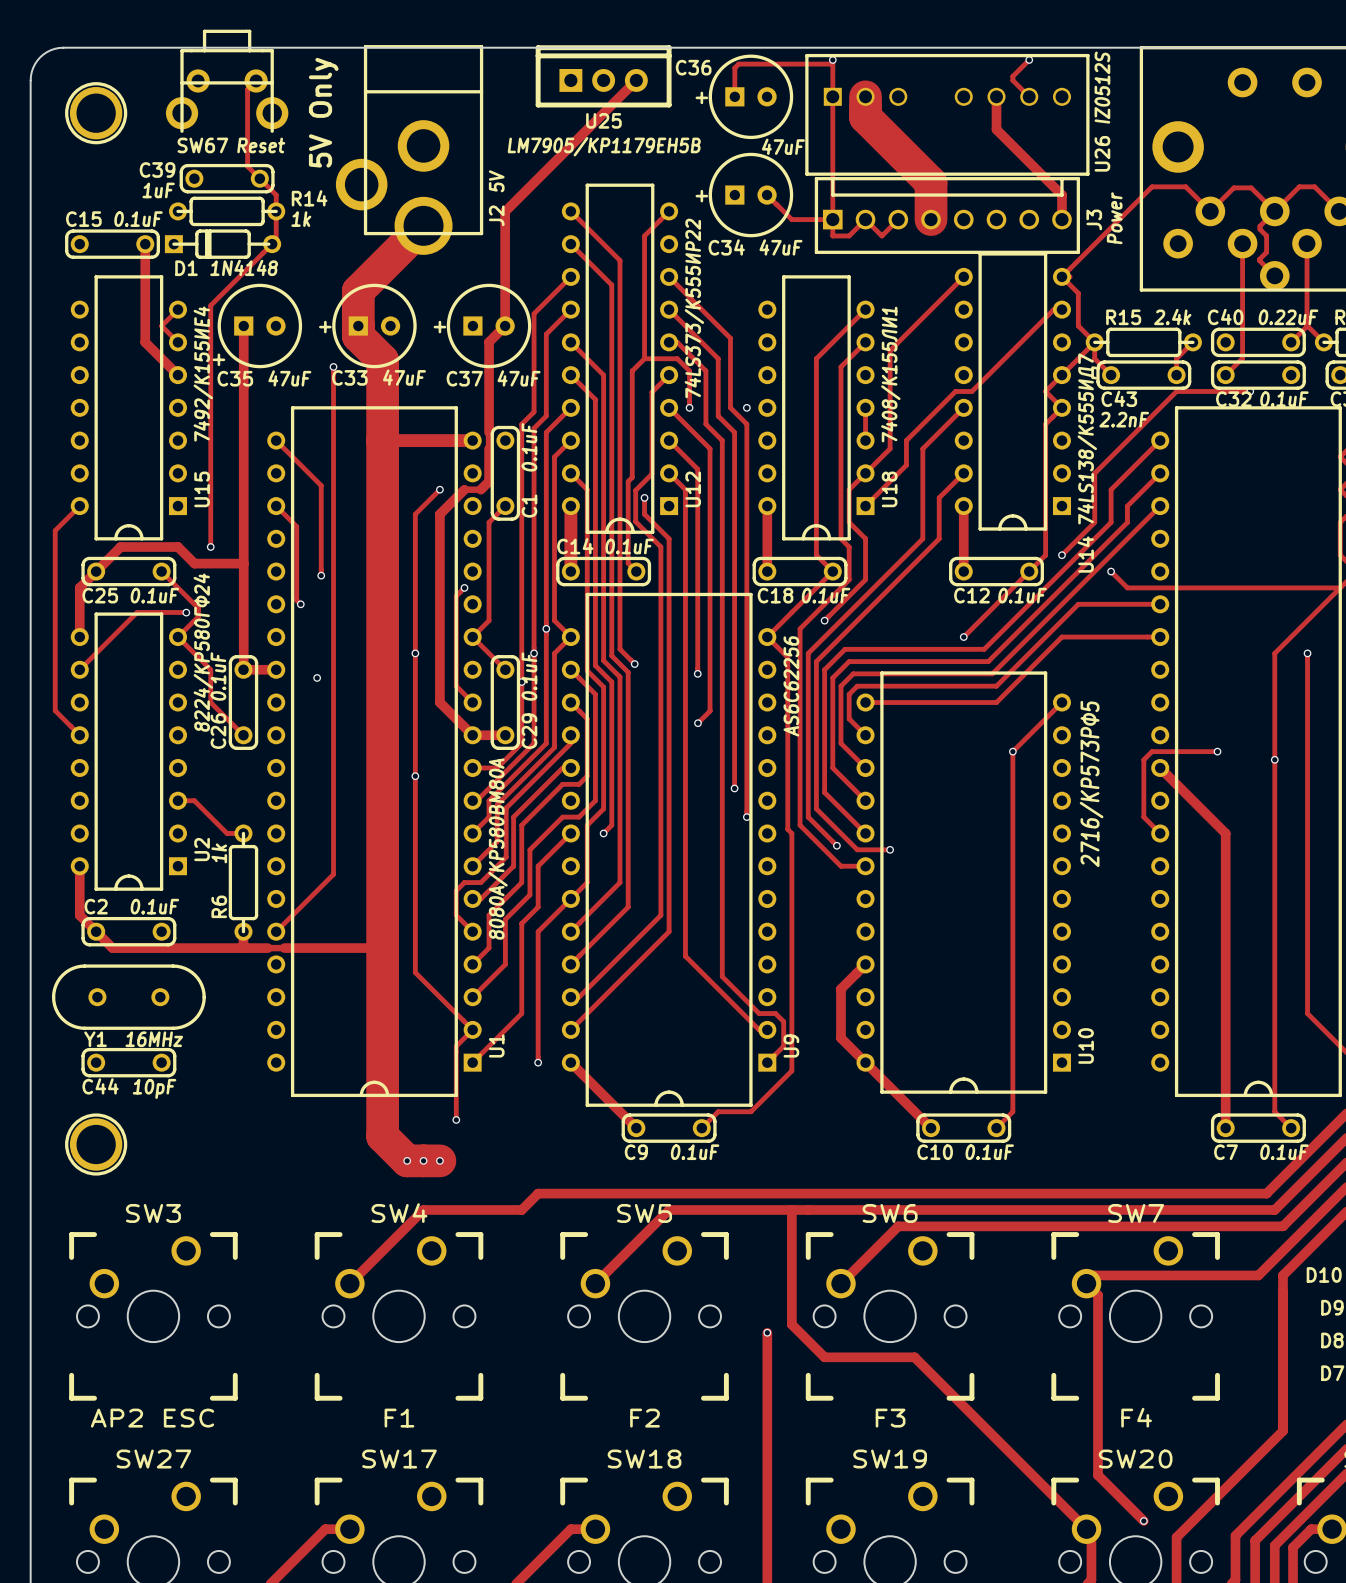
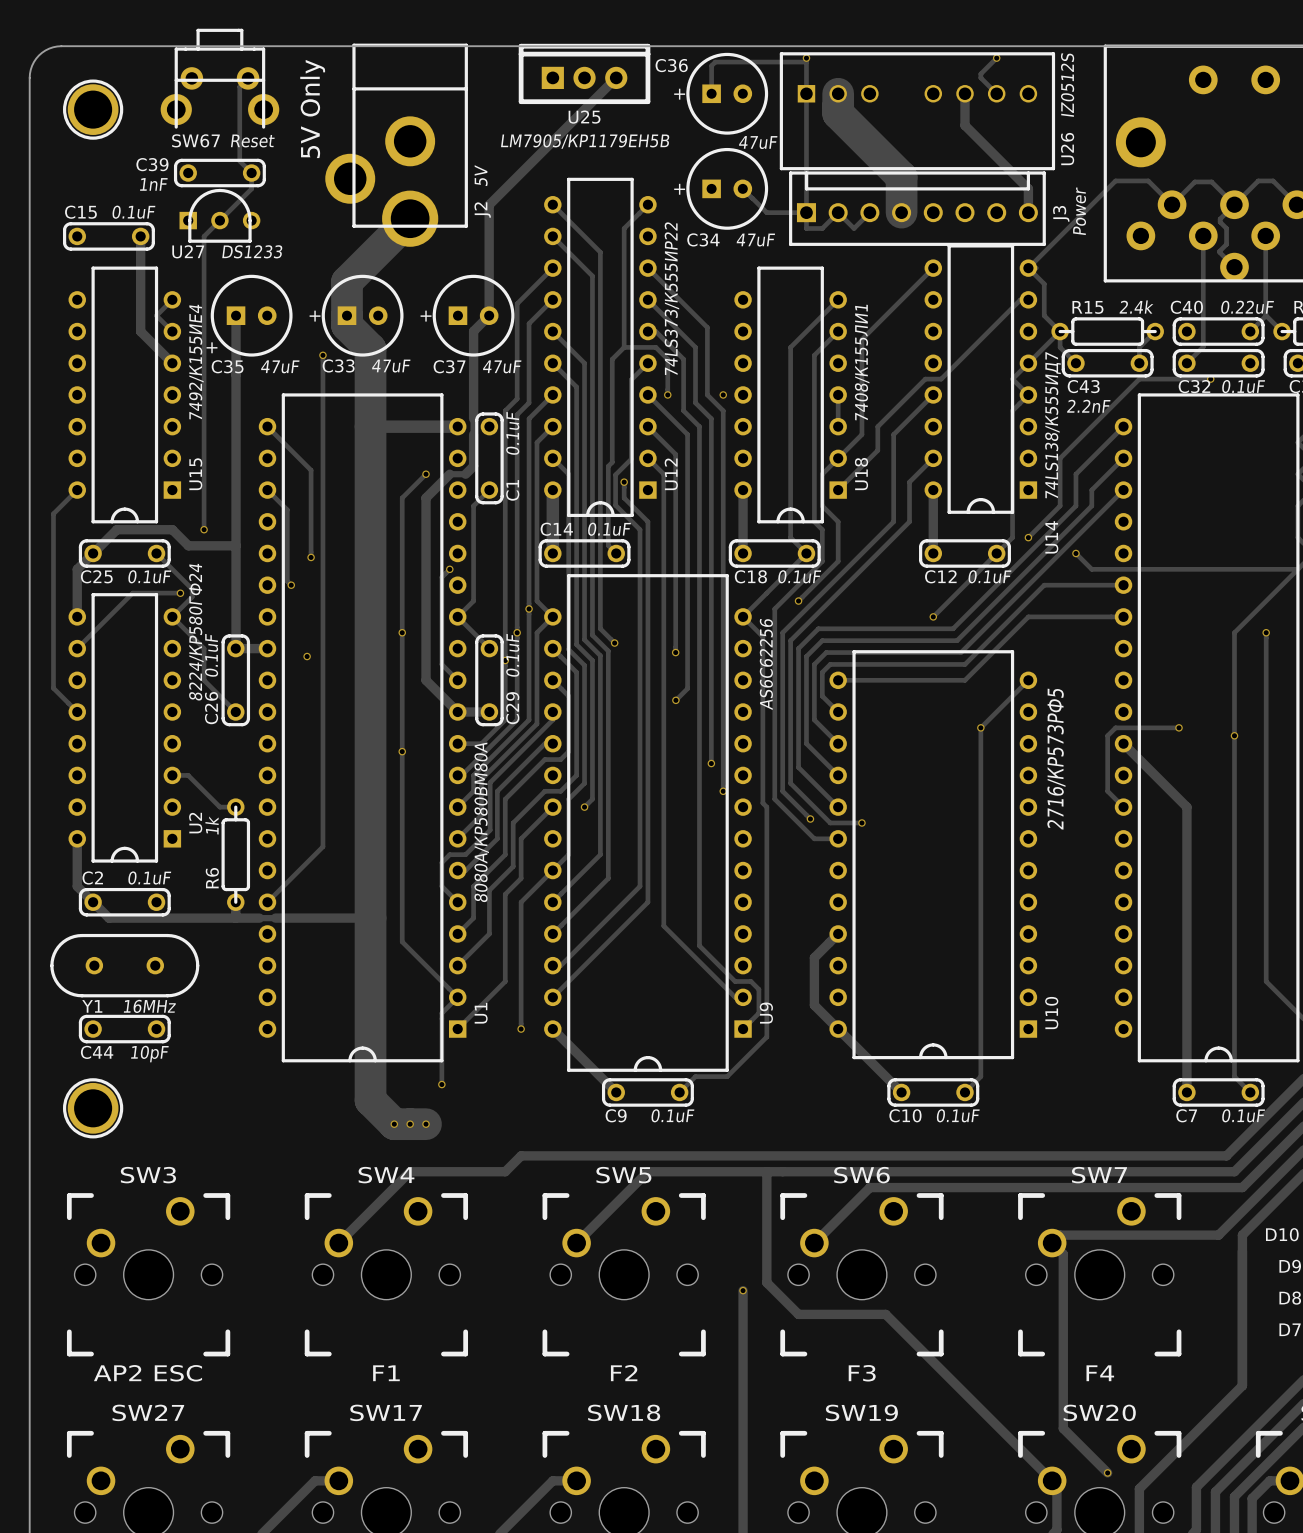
track: (259, 178) (276, 195) (276, 240) (210, 305) -> (251, 173) (251, 188) (204, 236) (204, 295)
C39 value: 1uF (158, 190) -> 1nF (153, 184)
R14: 1k (227, 211) -> none
U27: none -> DS1233 (219, 215)
D1: 1N4148 (223, 244) -> none

